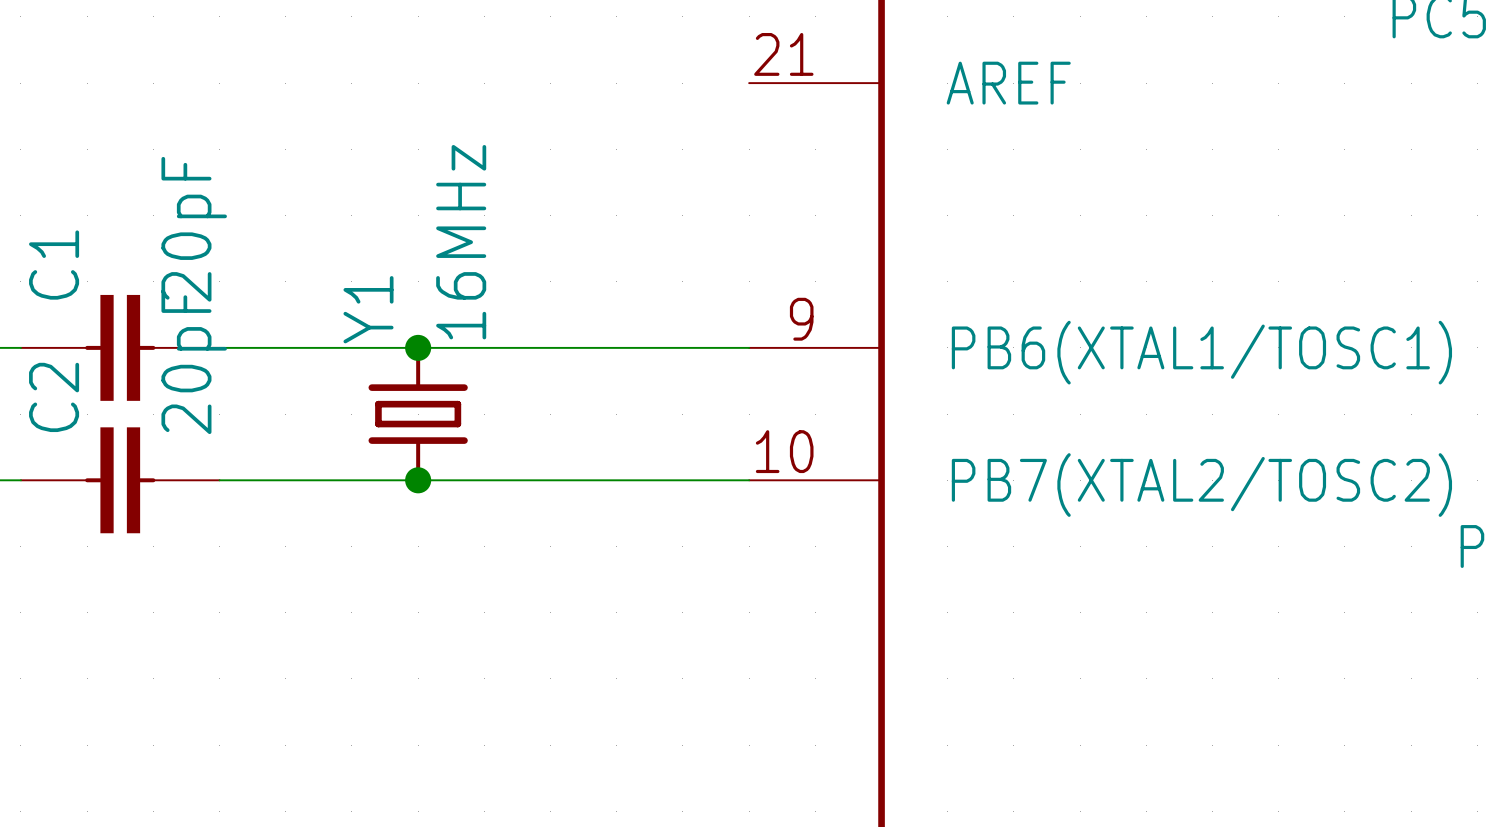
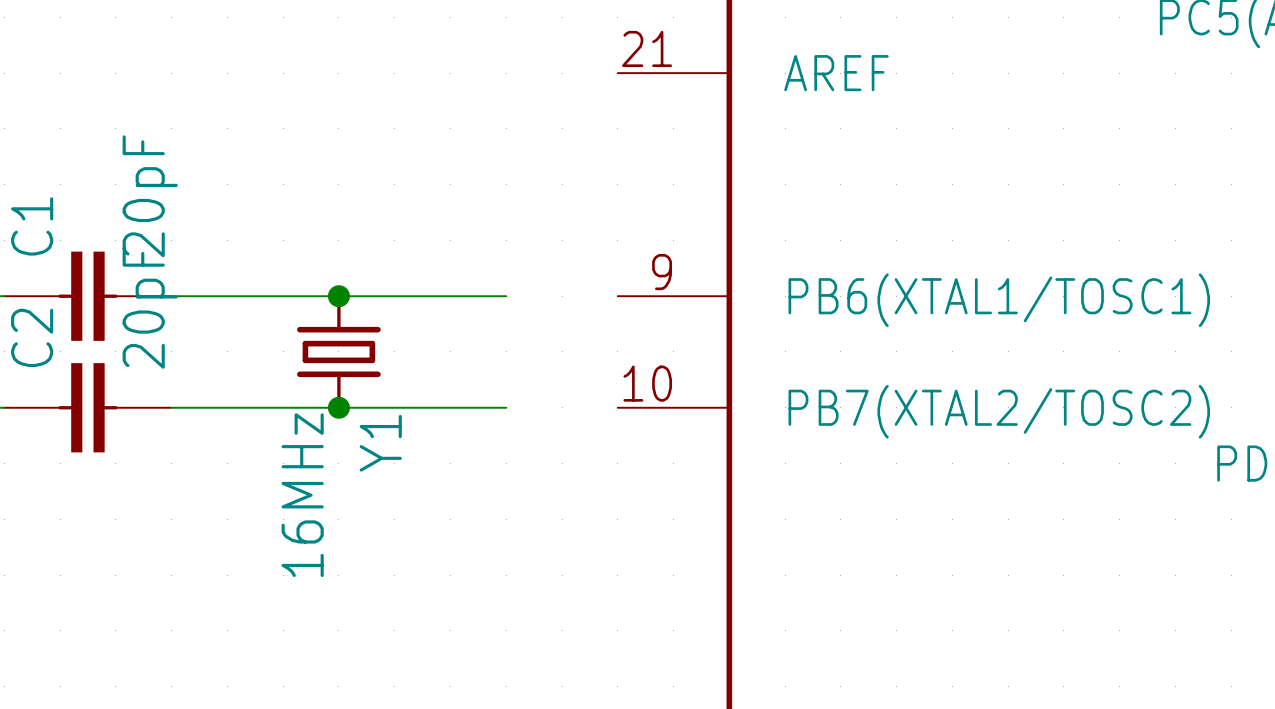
Y1 value position: 16MHz (461, 242) -> 16MHz (302, 495)
Y1 name position: Y1 (368, 309) -> Y1 (380, 443)
wire: (616, 347) (749, 347) -> none
wire: (616, 480) (749, 480) -> none

